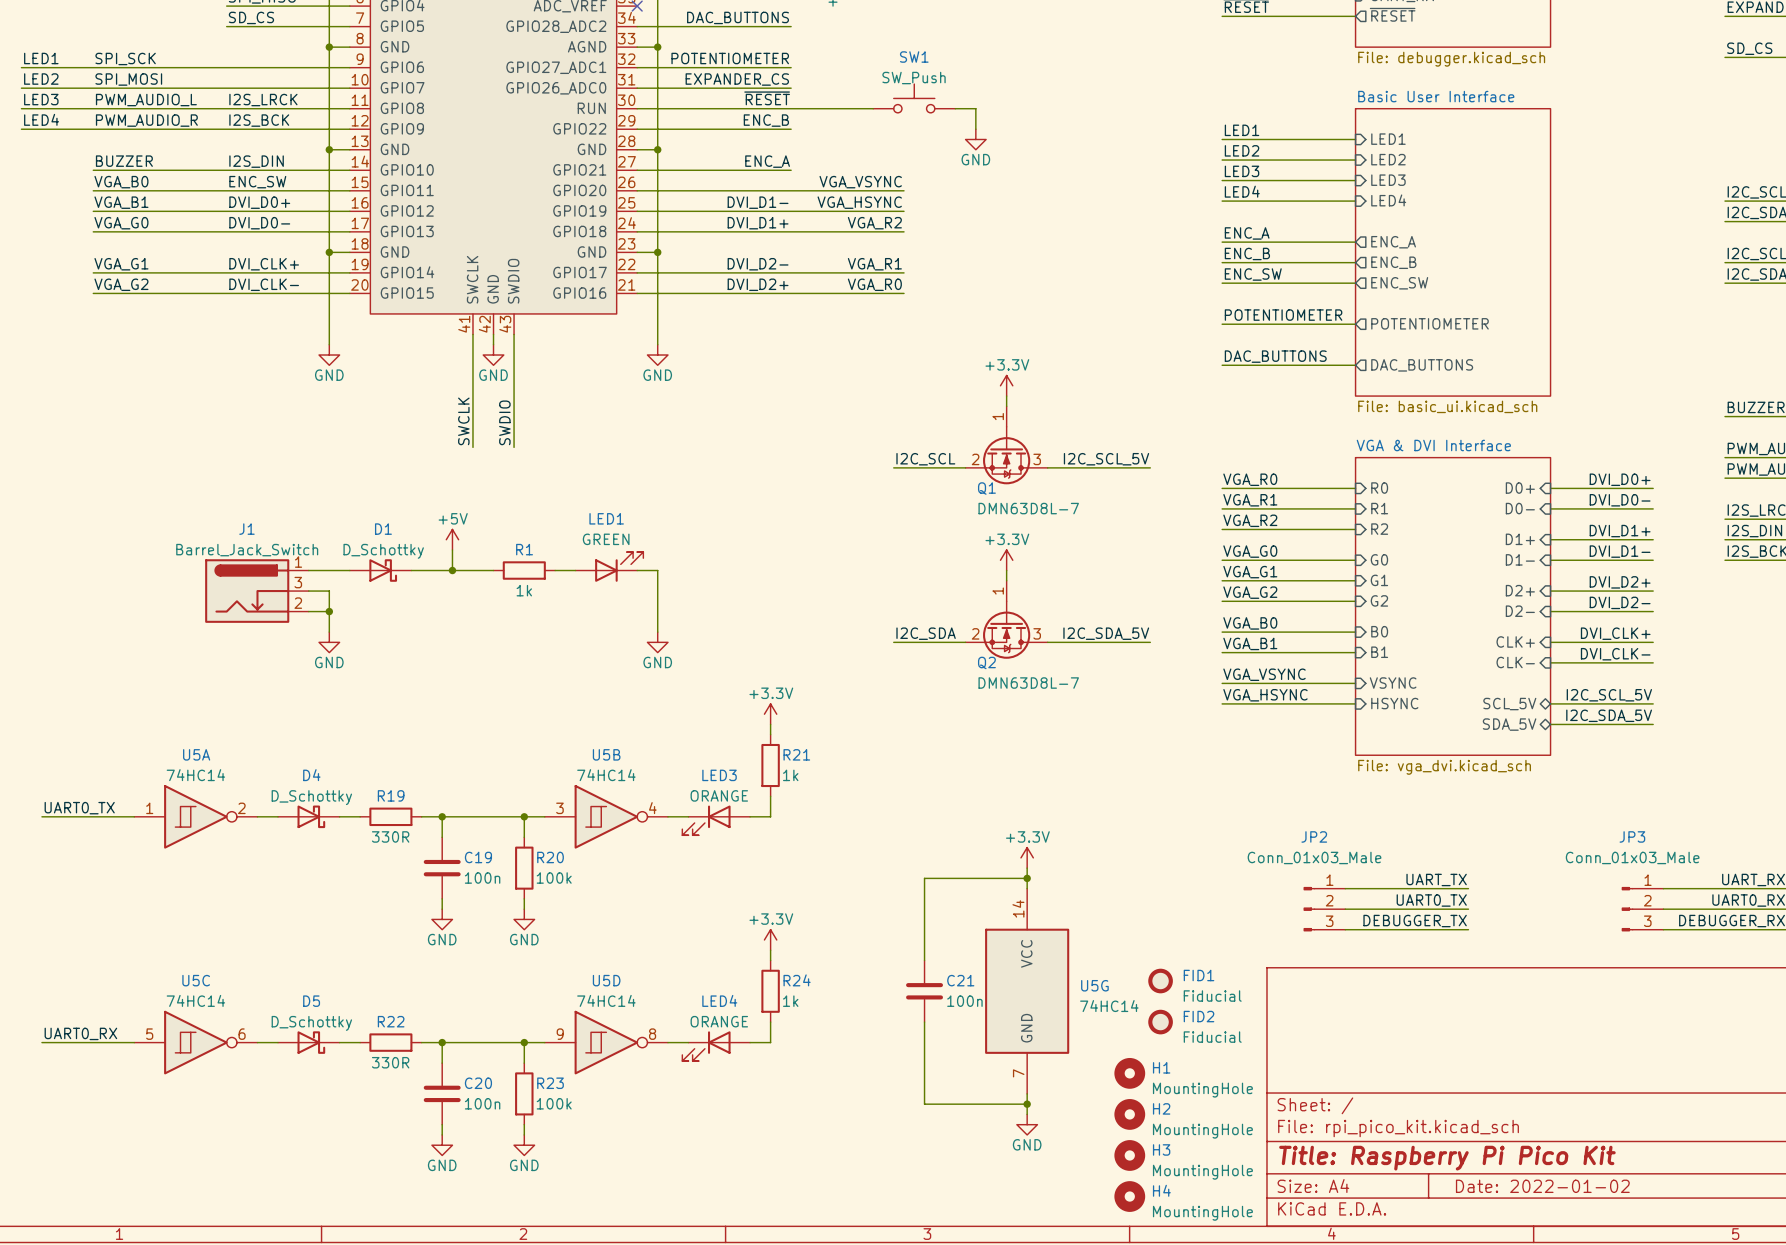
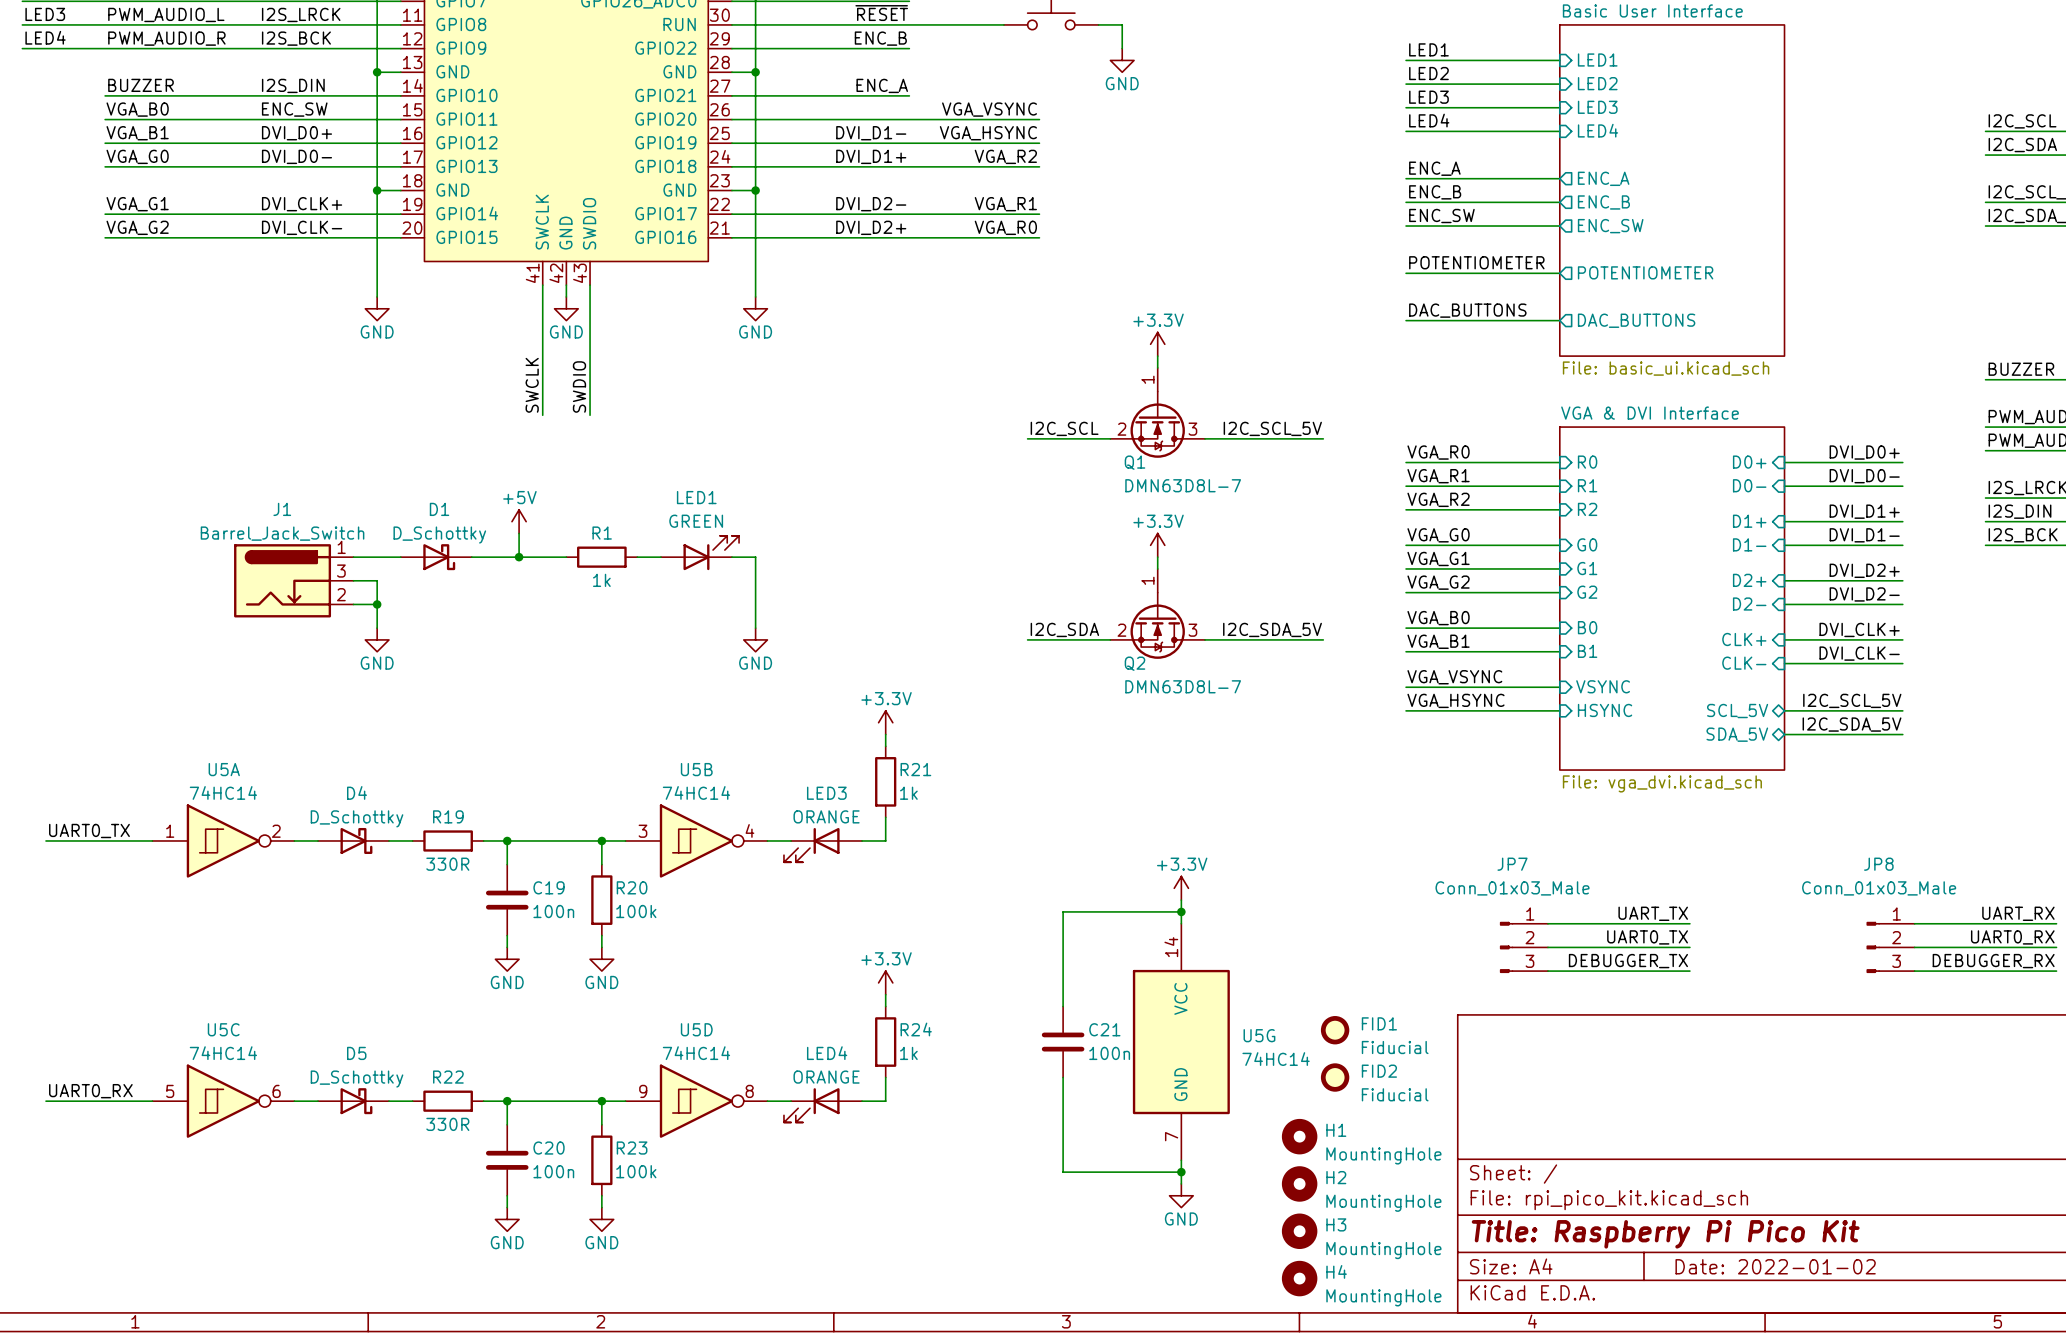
JP2 name: JP2 (1314, 836) -> JP7 (1512, 864)
JP3 name: JP3 (1632, 836) -> JP8 (1878, 864)

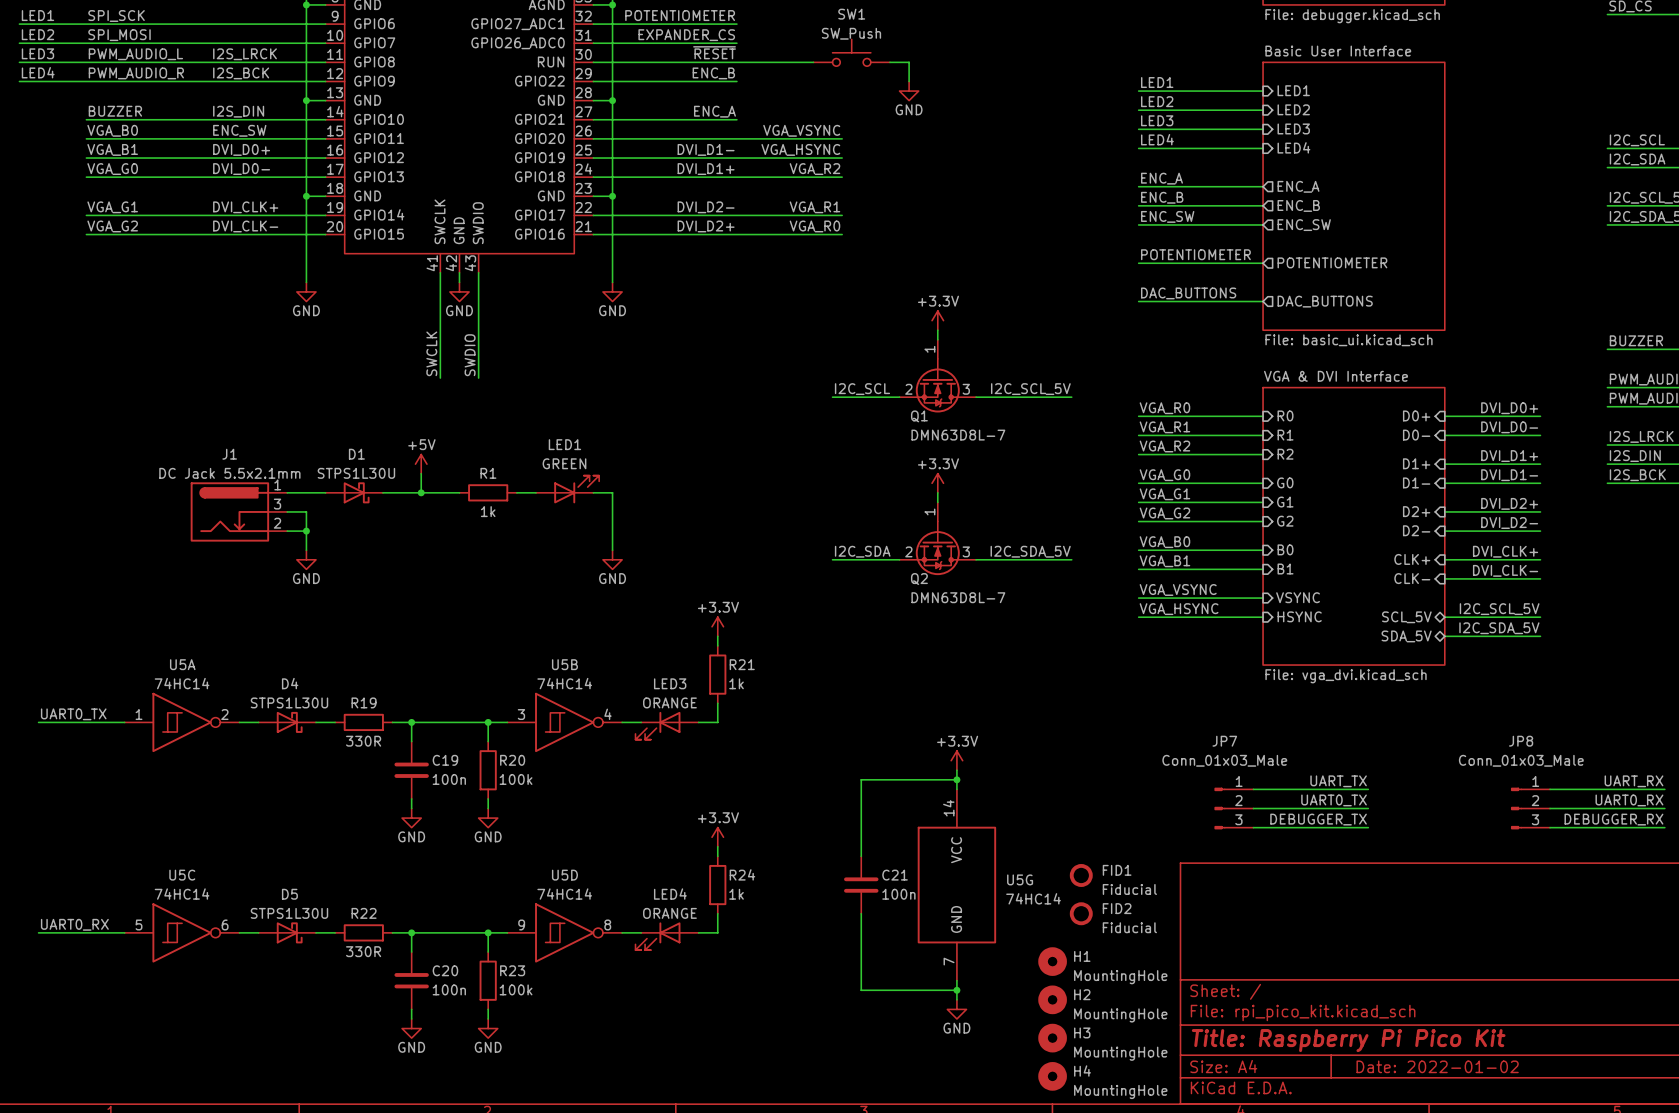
J1 value: Barrel_Jack_Switch (282, 533) -> DC Jack 5.5x2.1mm (229, 473)
D1 value: D_Schottky (439, 535) -> STPS1L30U (356, 473)
D4 value: D_Schottky (357, 818) -> STPS1L30U (289, 702)
D5 value: D_Schottky (357, 1079) -> STPS1L30U (289, 913)

